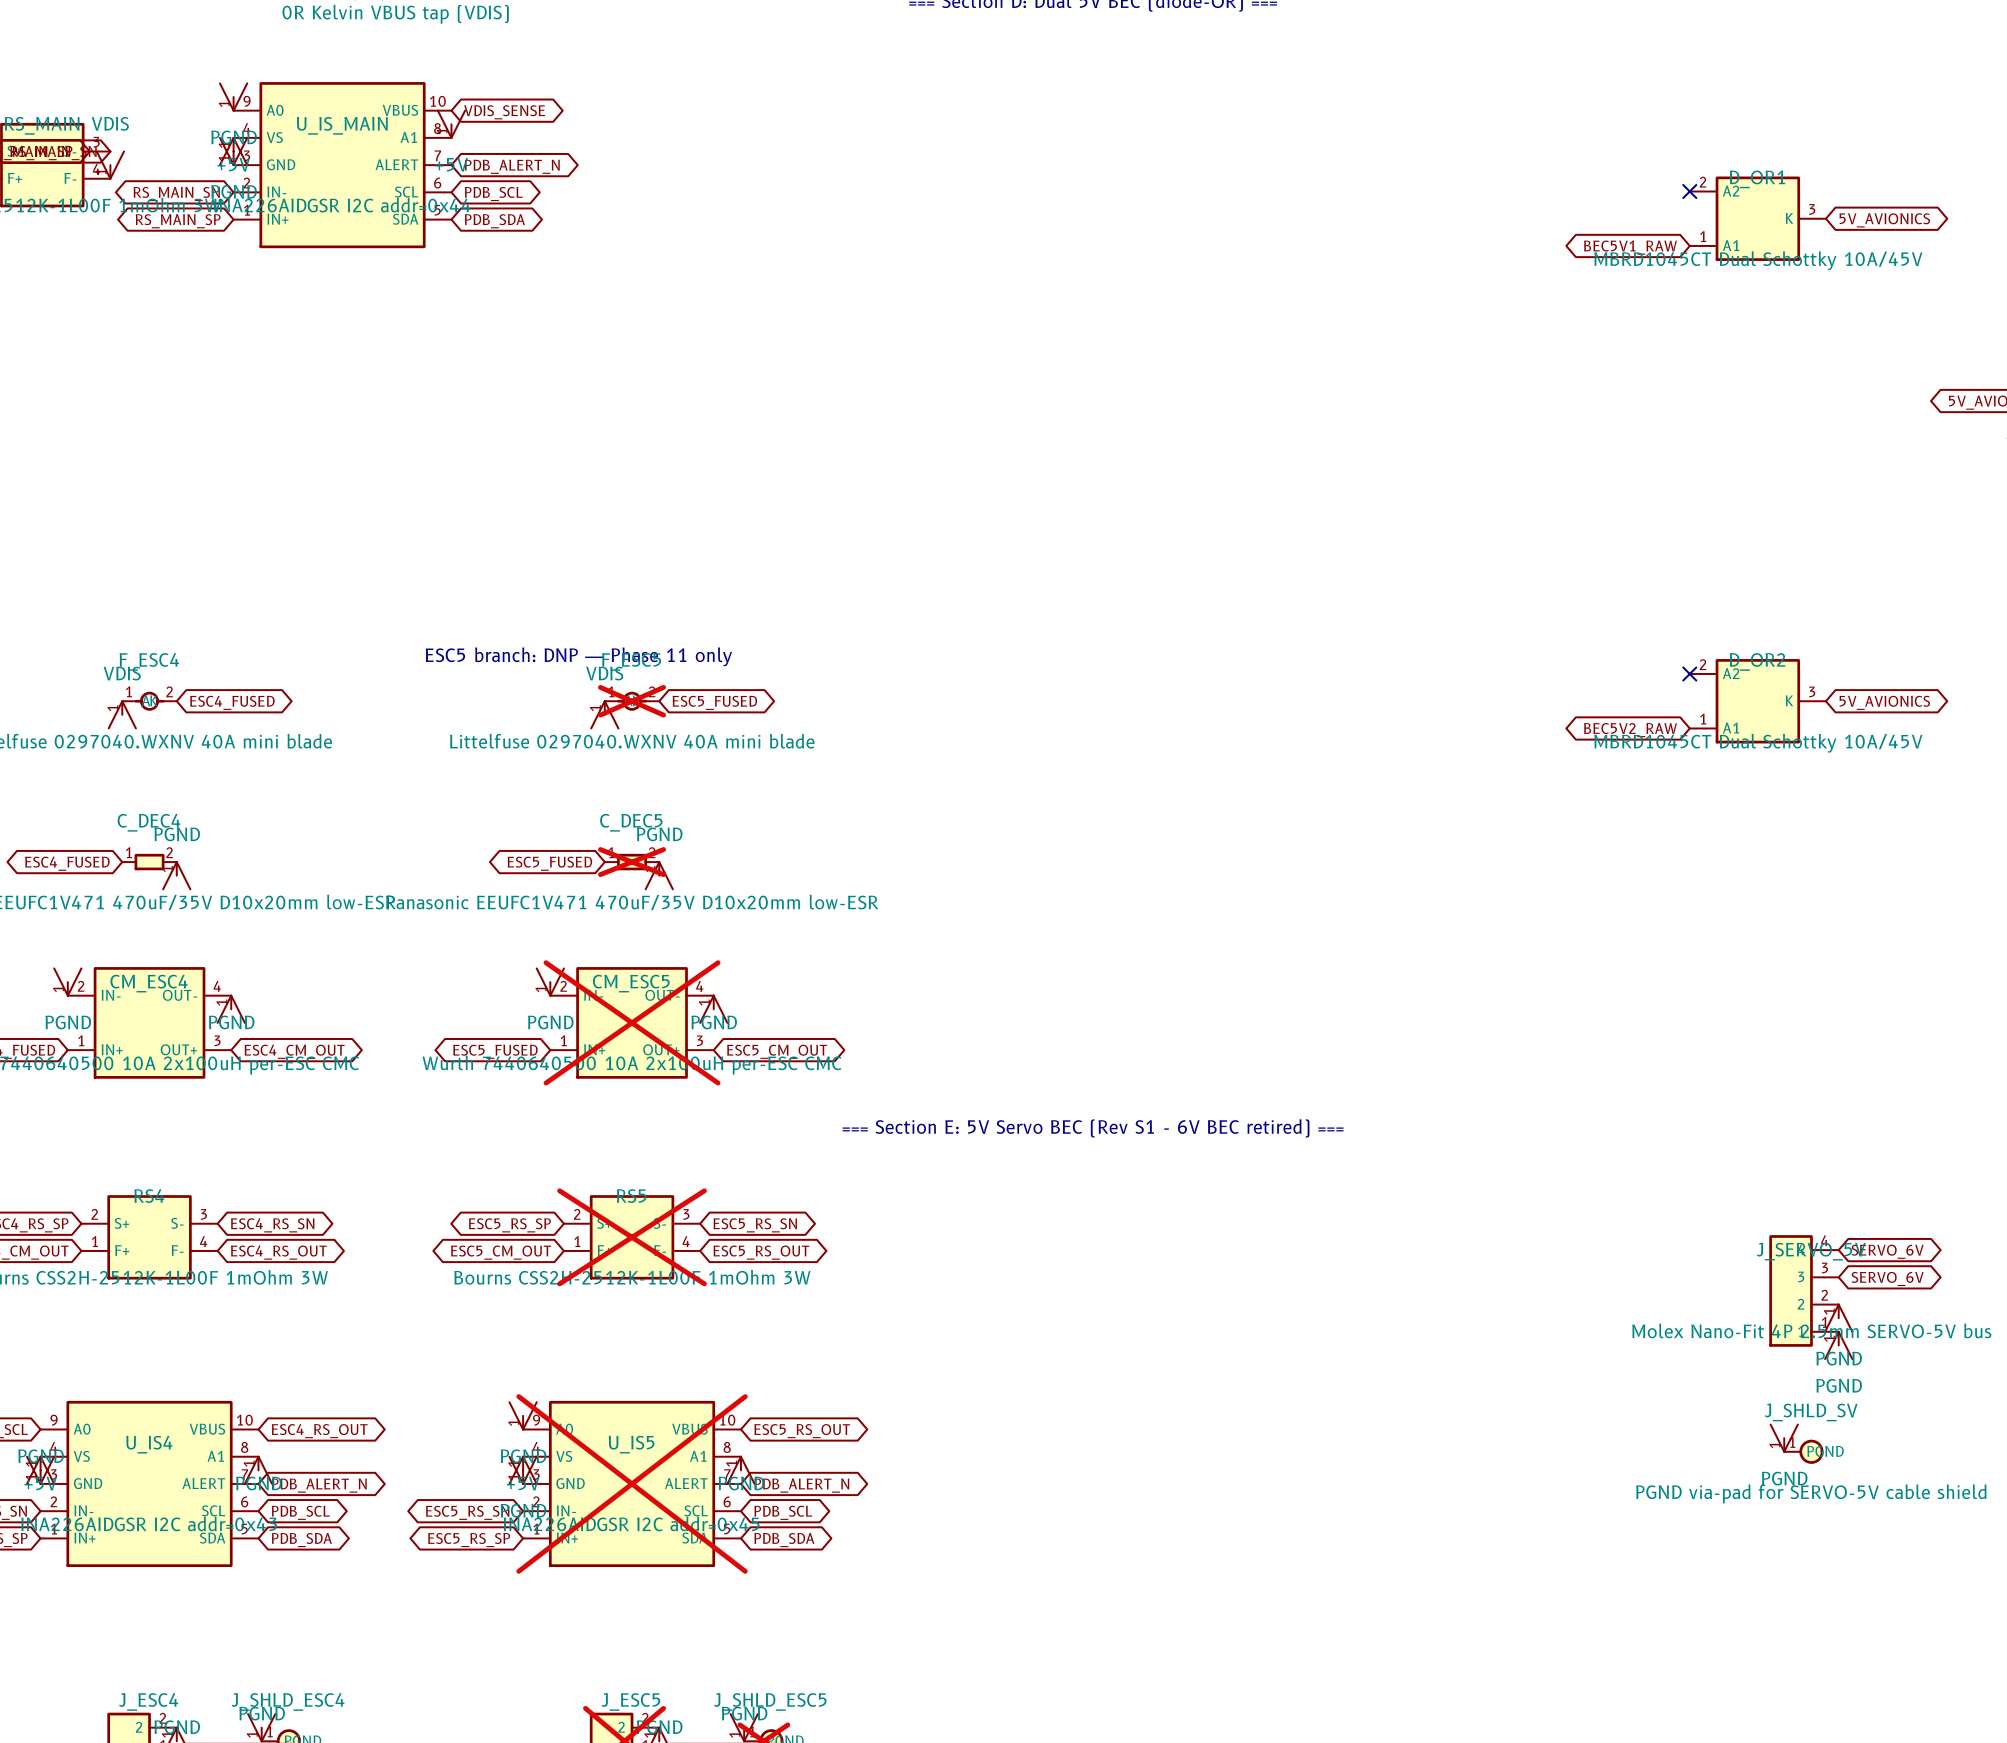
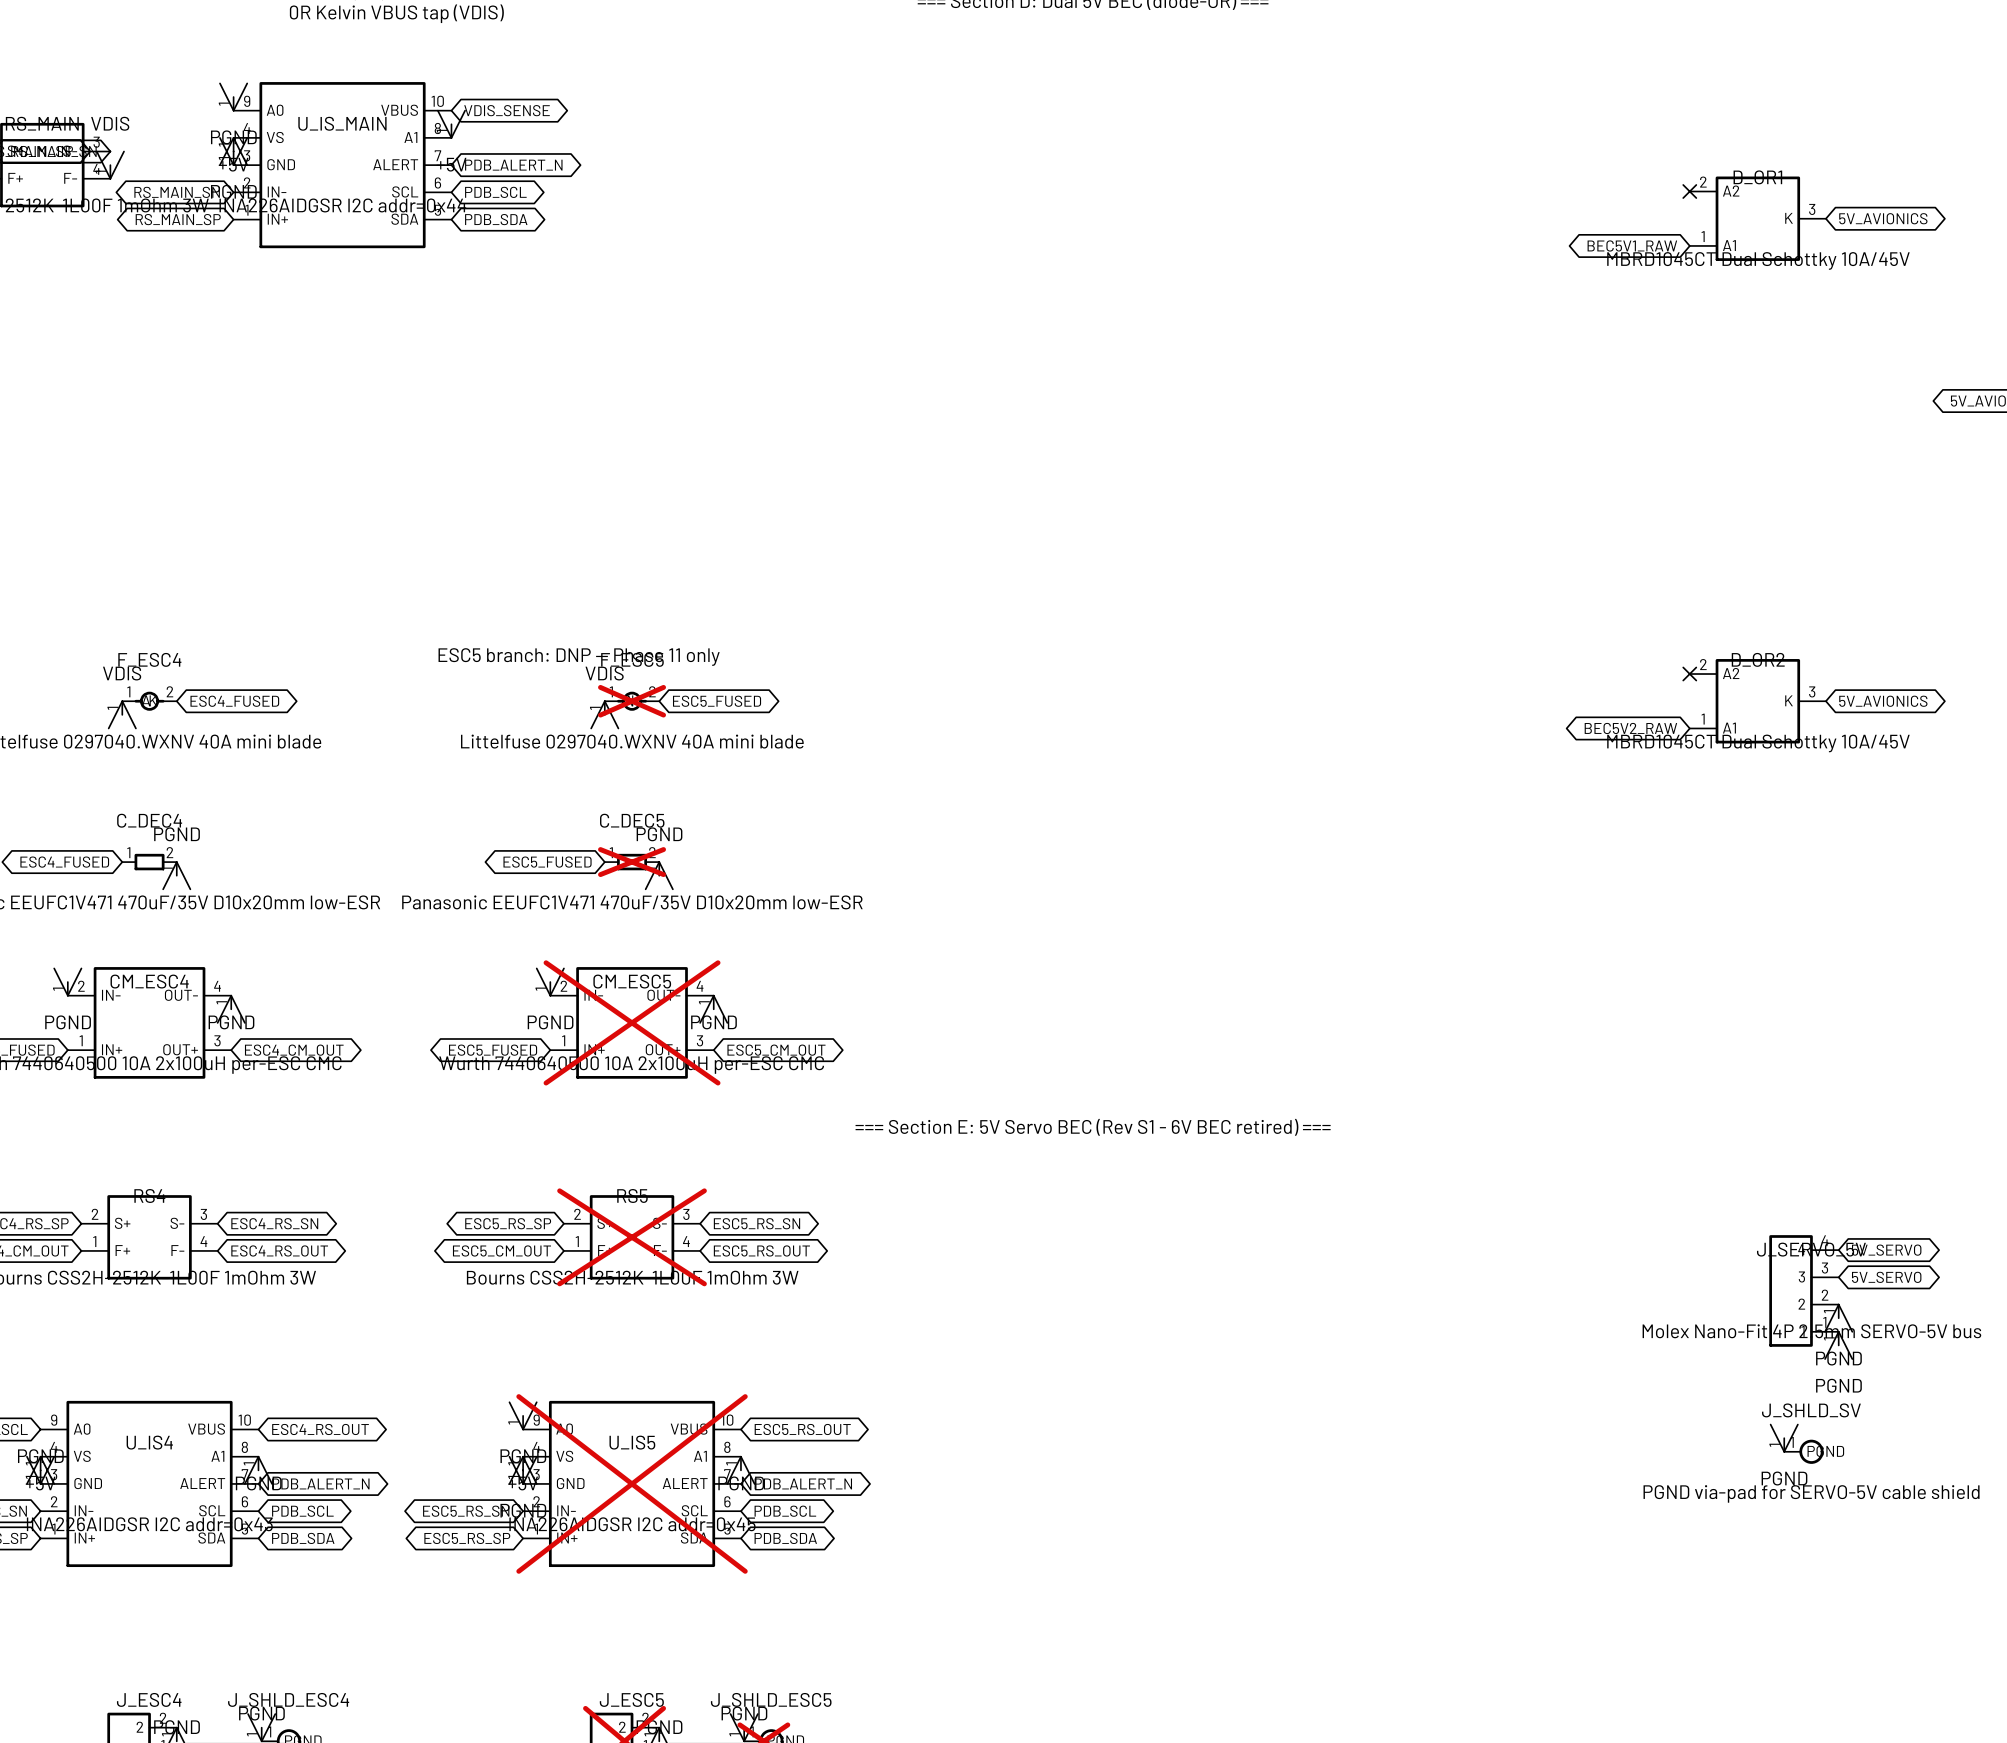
global label: SERVO_6V (1887, 1251) -> 5V_SERVO (1886, 1250)
global label: SERVO_6V (1887, 1278) -> 5V_SERVO (1886, 1277)

